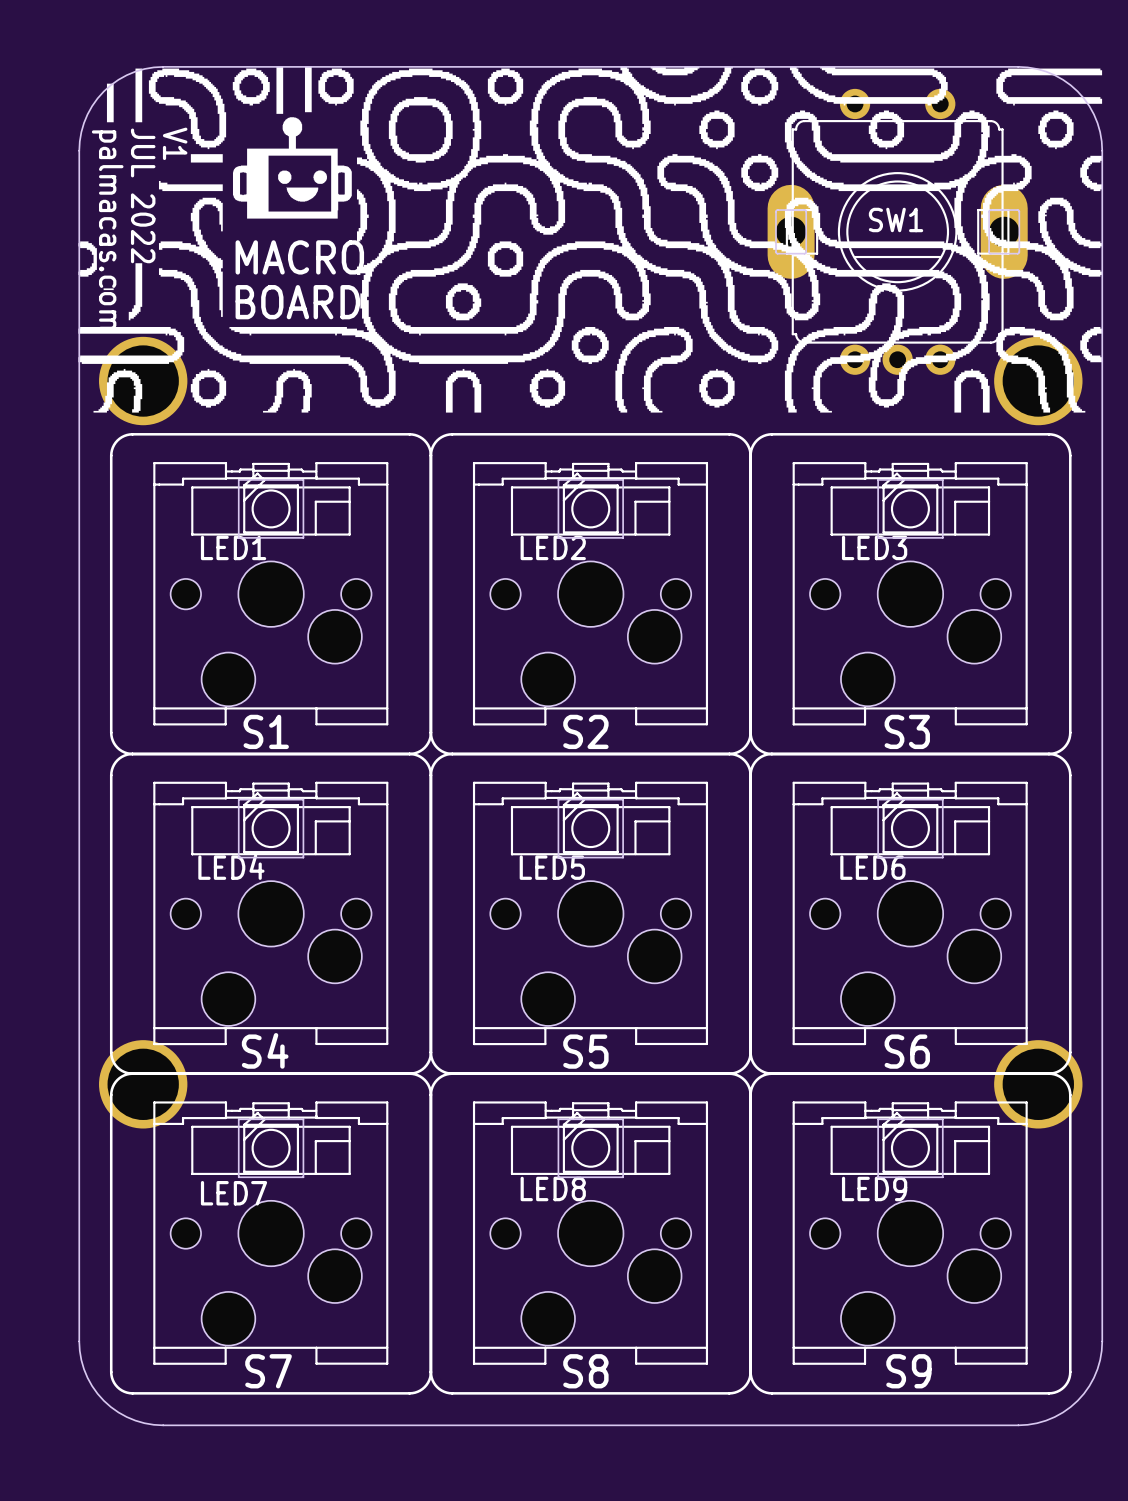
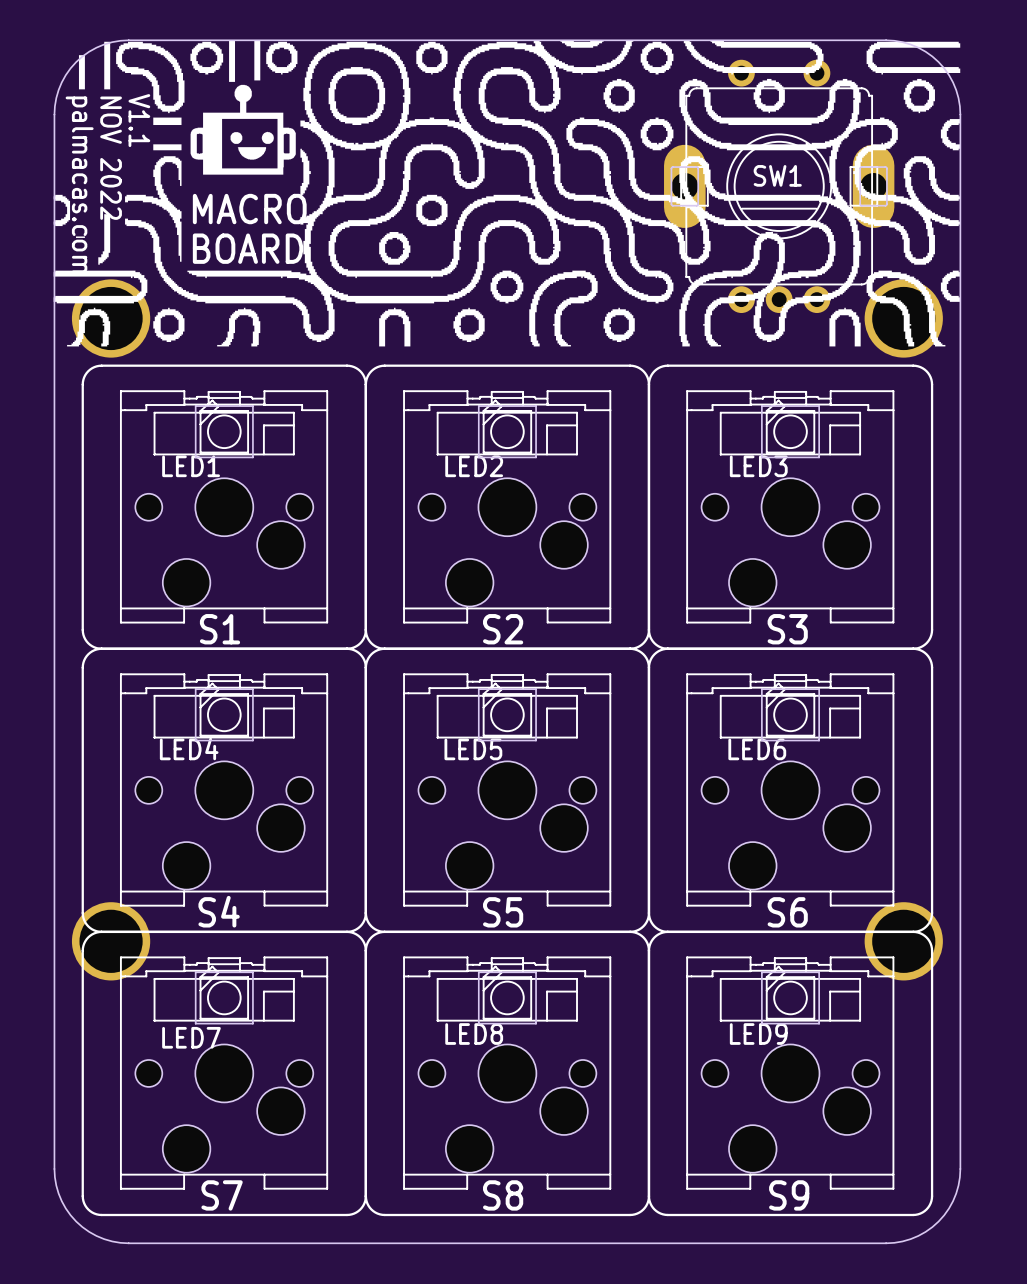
text: V1 (175, 143) -> V1.1 (139, 120)
drawing: [158, 181, 223, 192] -> none
drawing: none -> [153, 144, 182, 151]
text: JUL 2022 (143, 195) -> NOV 2022 (111, 158)

